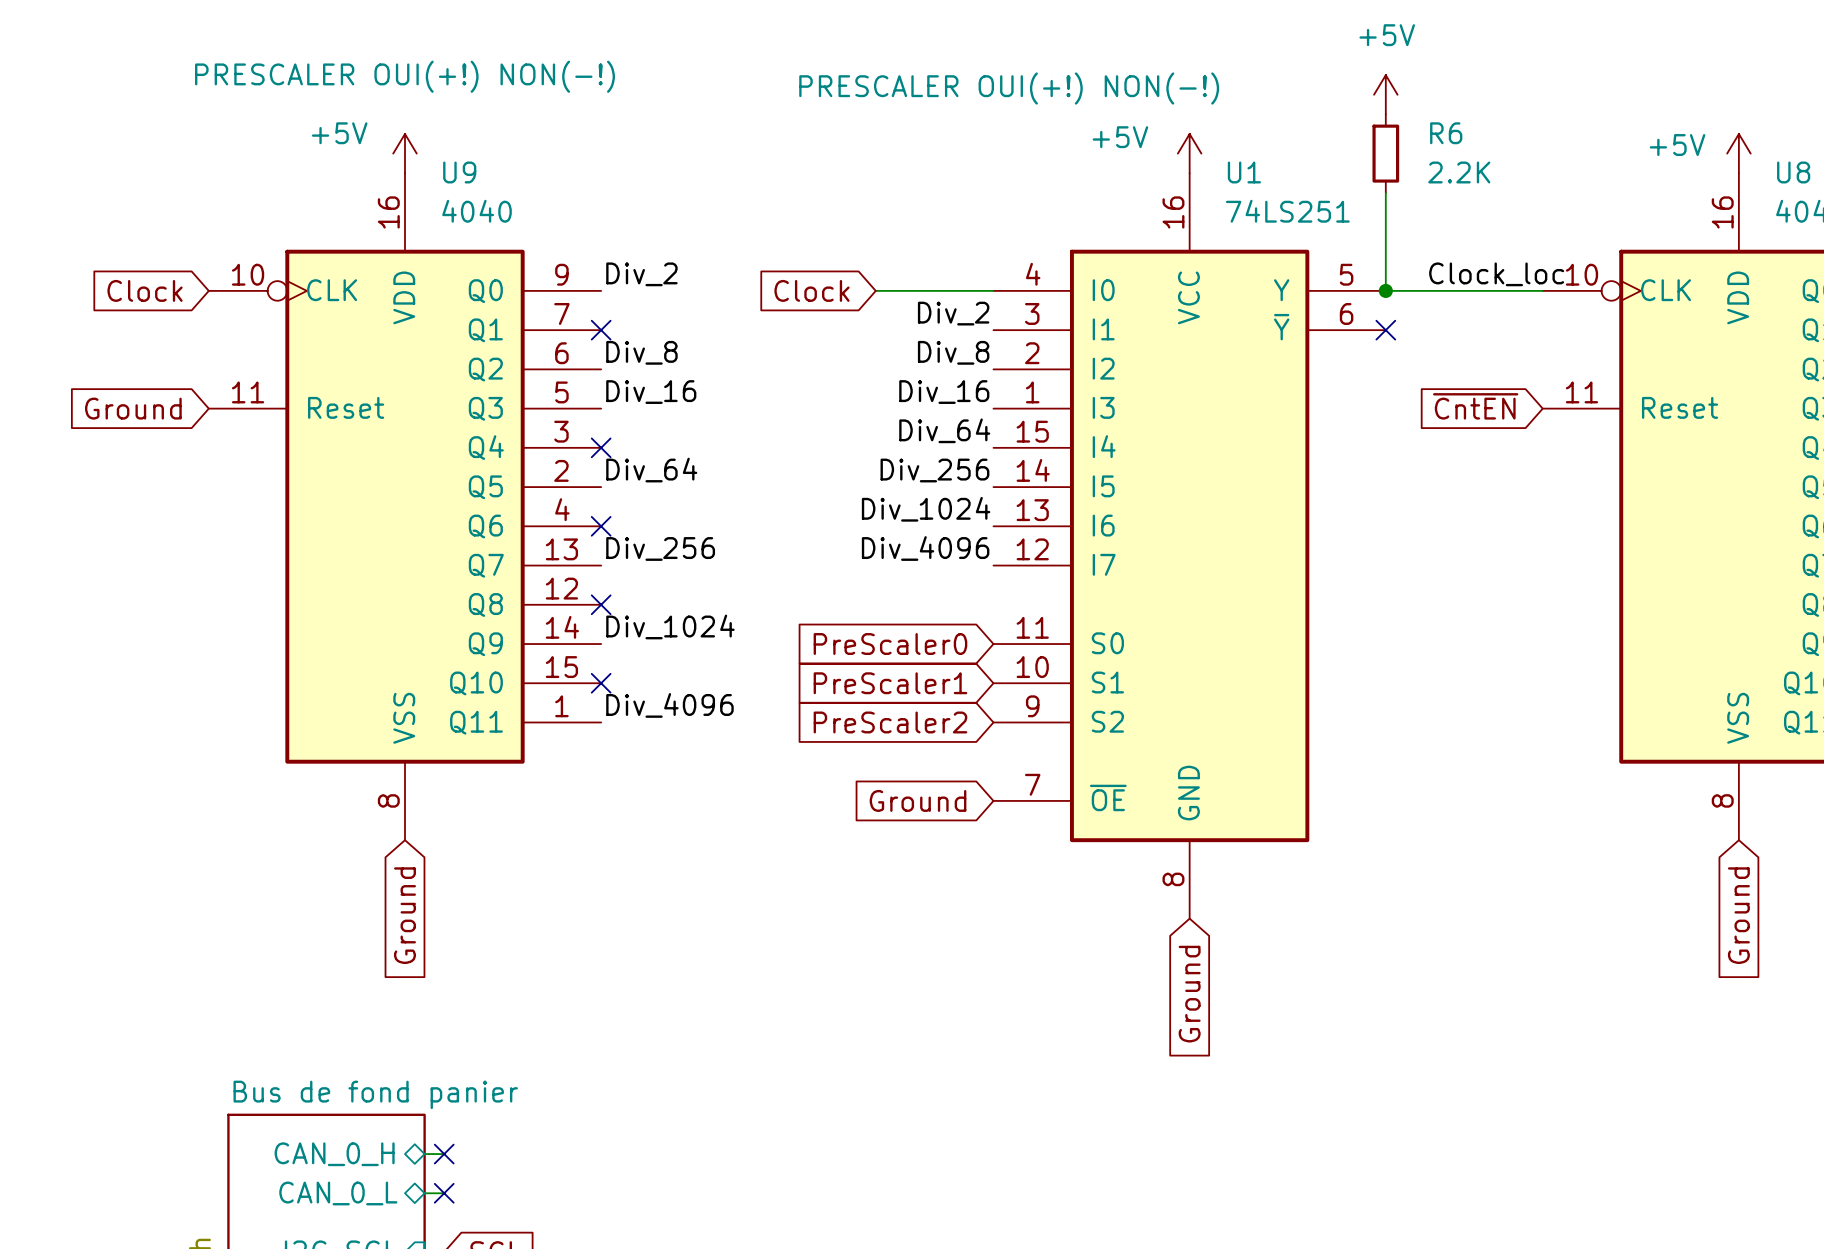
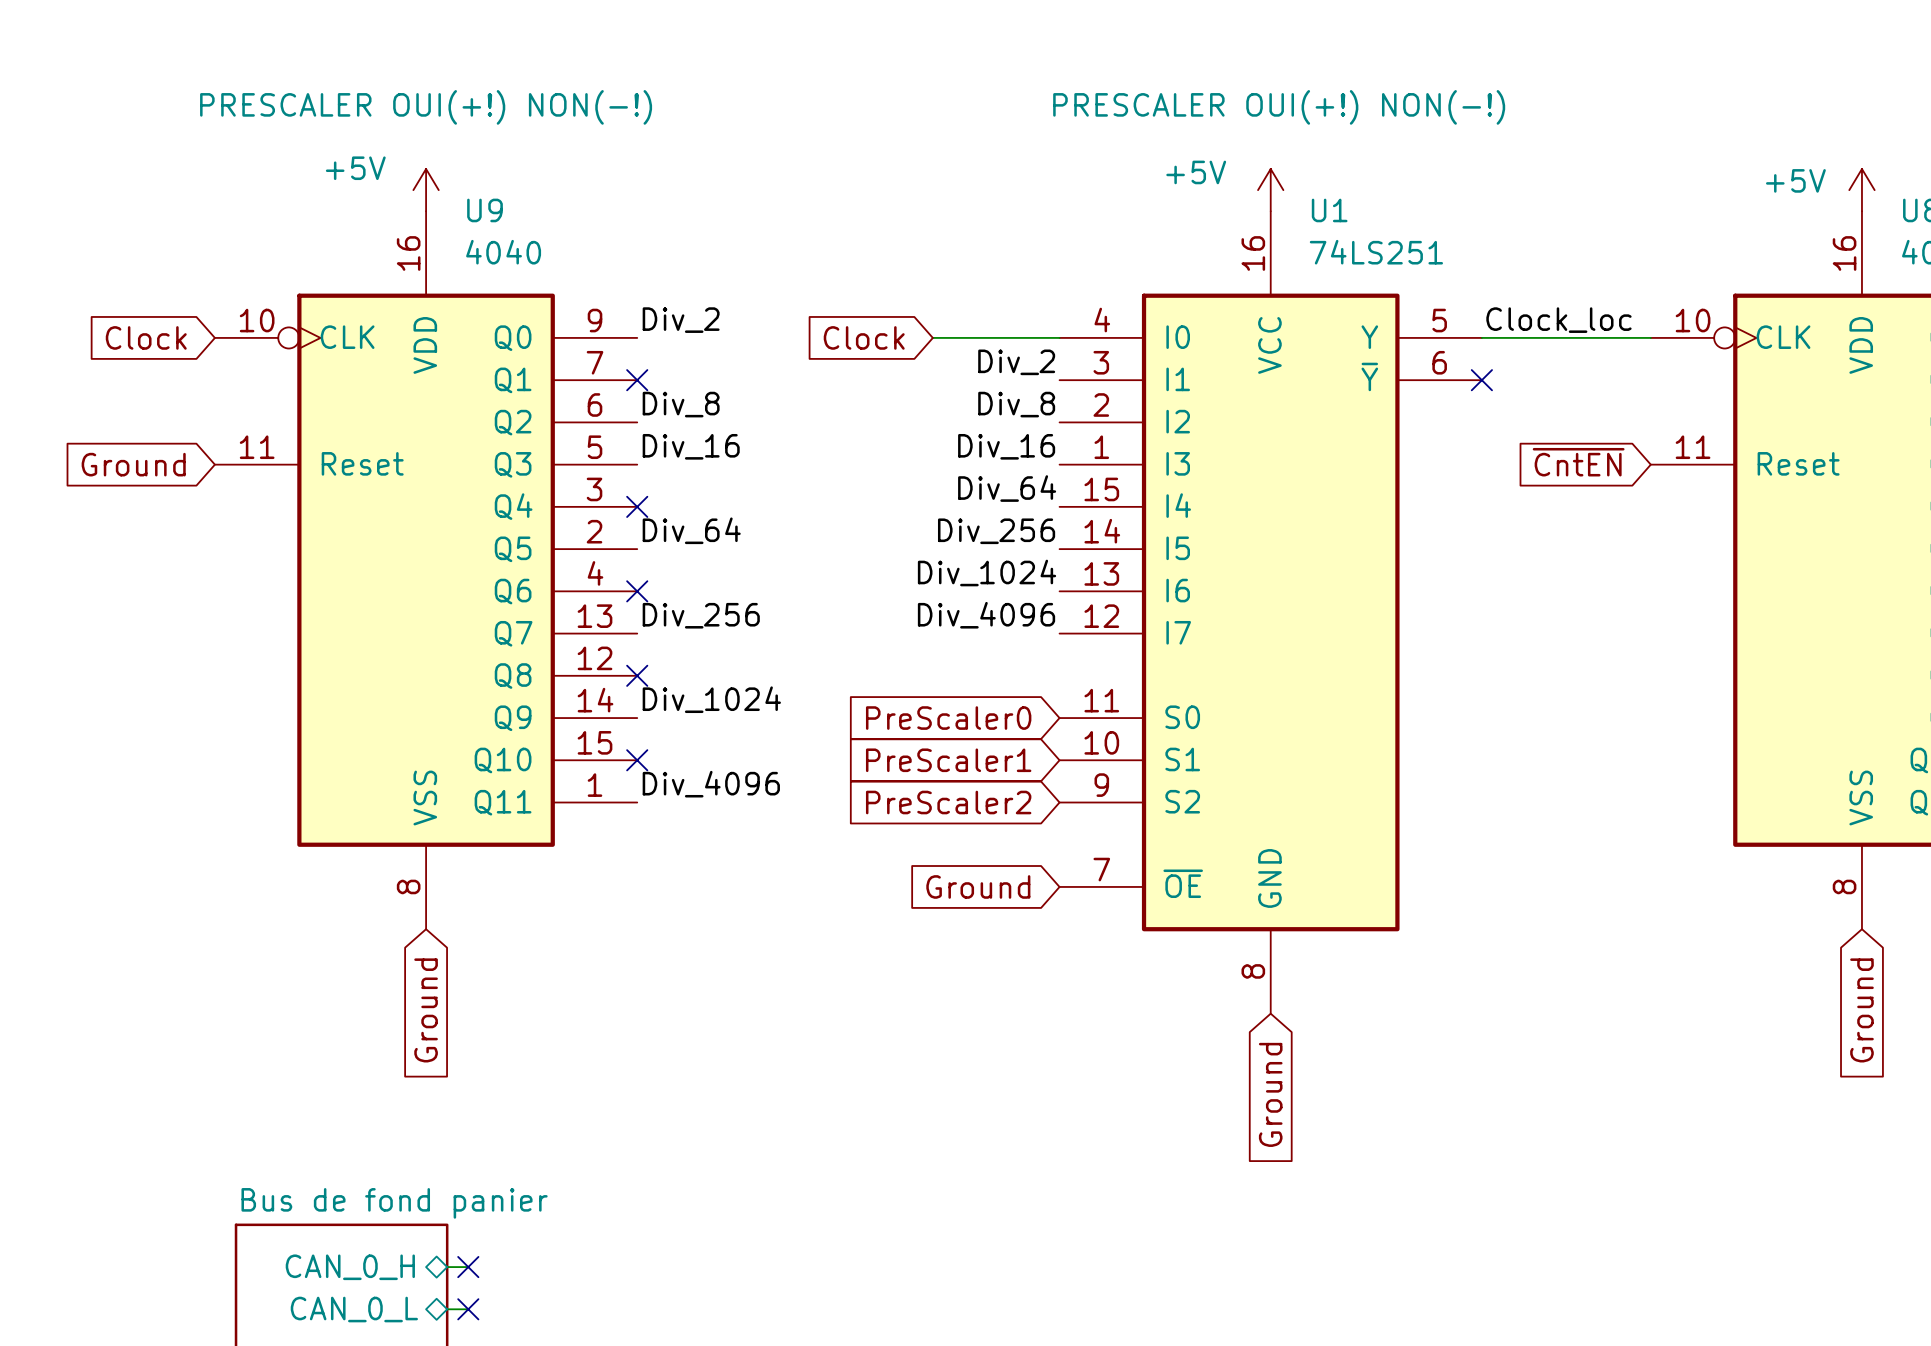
U1 text position: PRESCALER OUI(+!) NON(-!) (1009, 88) -> PRESCALER OUI(+!) NON(-!) (1279, 107)
power symbol: +5V (1385, 94) -> none
R6: 2.2K (1385, 153) -> none
wire: (1385, 192) (1385, 290) -> none
label position: Clock_loc (1496, 274) -> Clock_loc (1558, 320)
junction: (1385, 290) -> none

